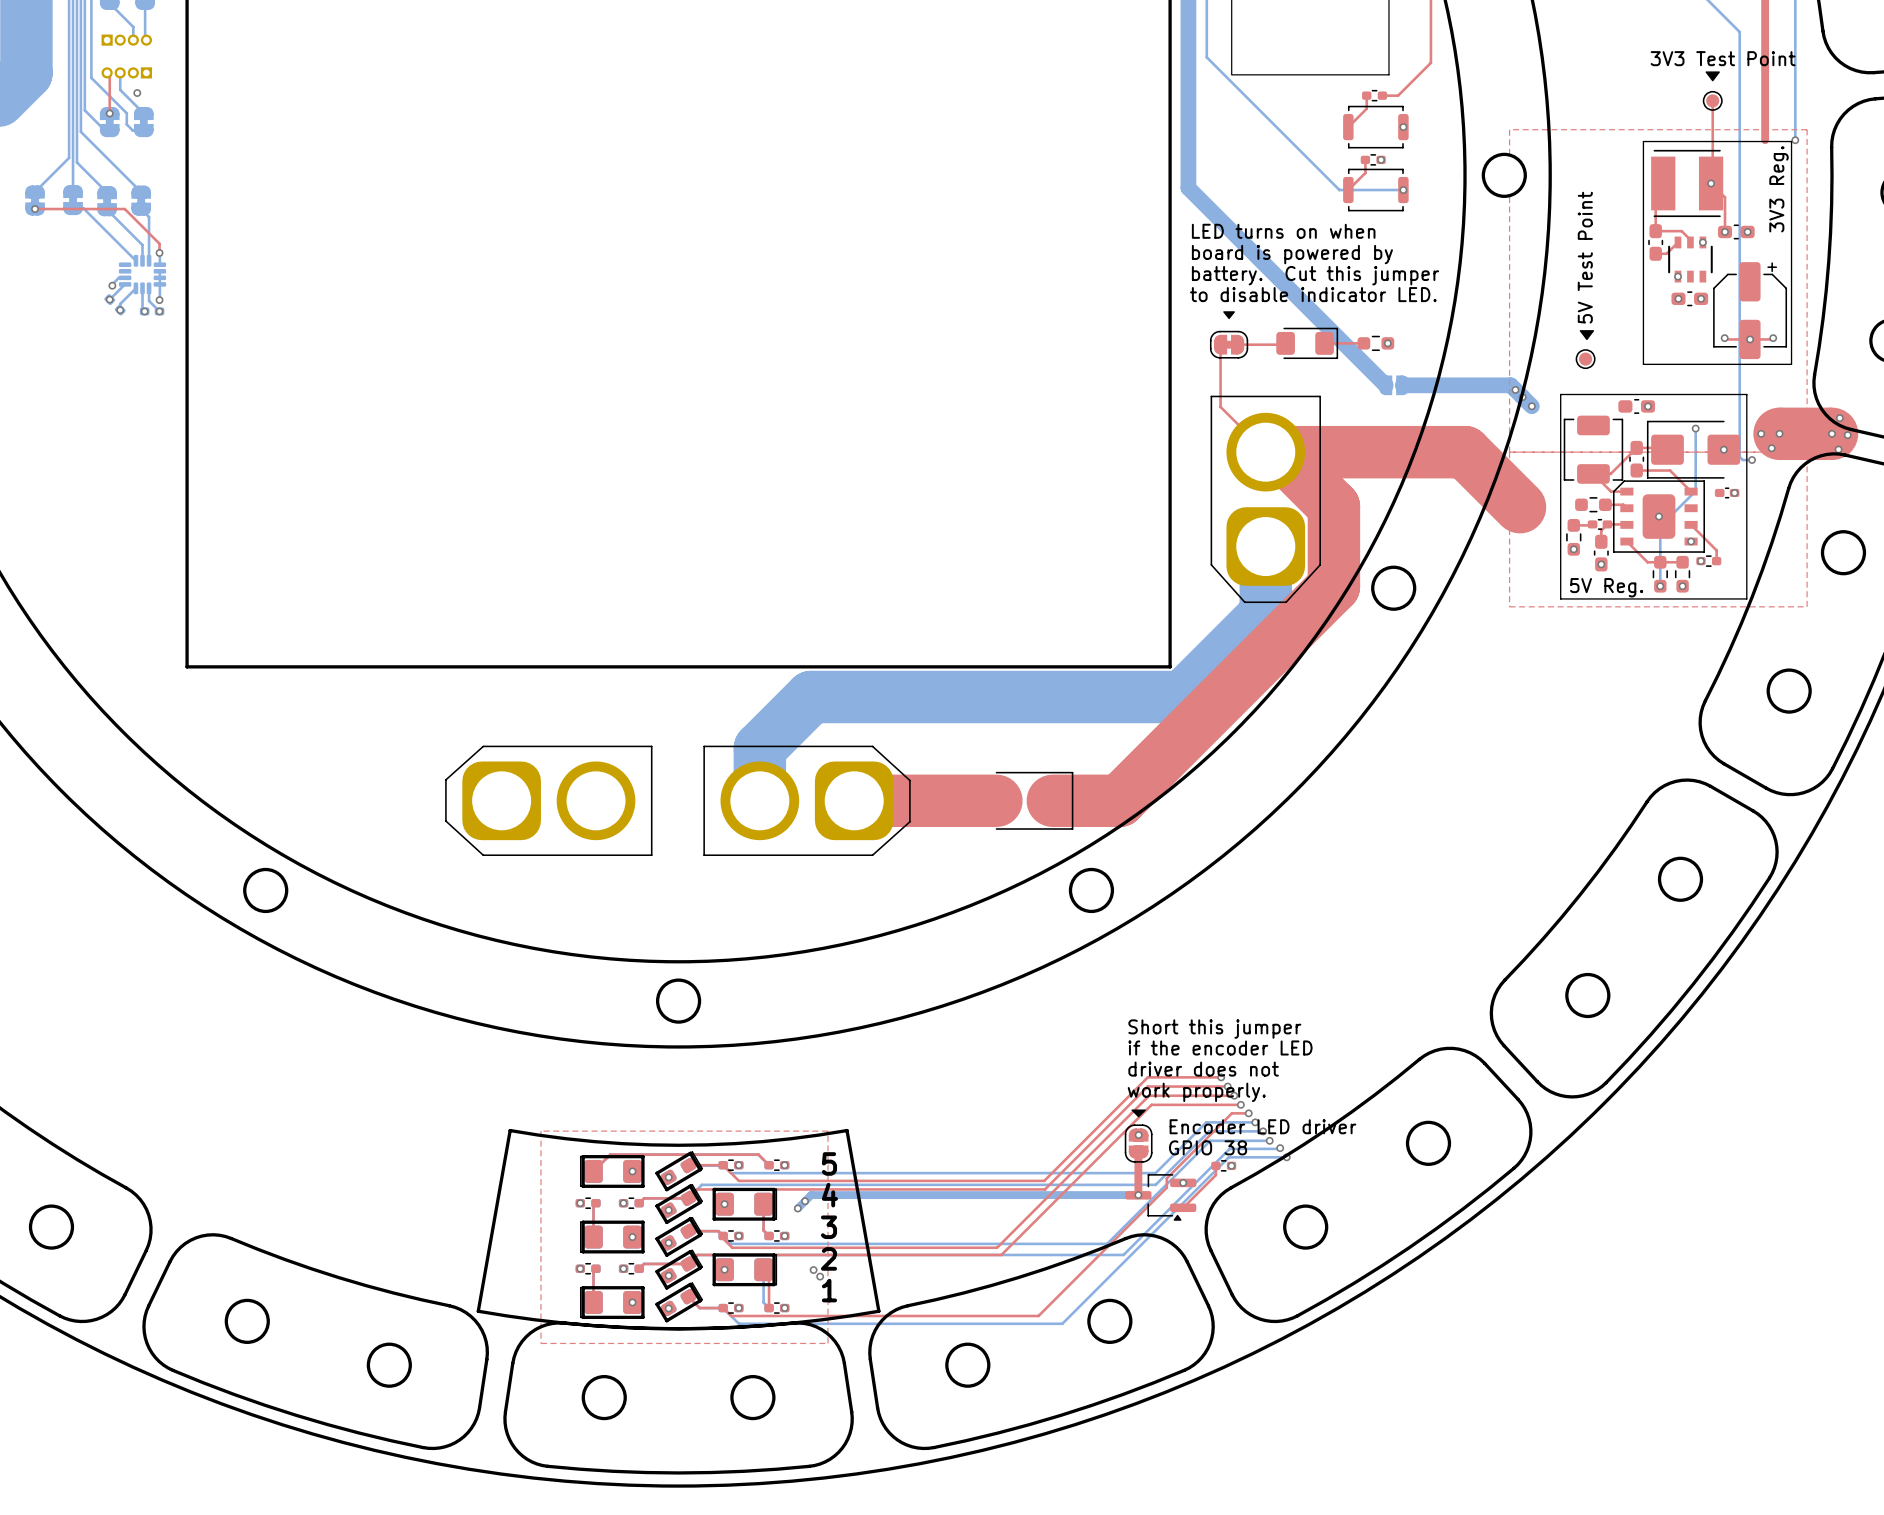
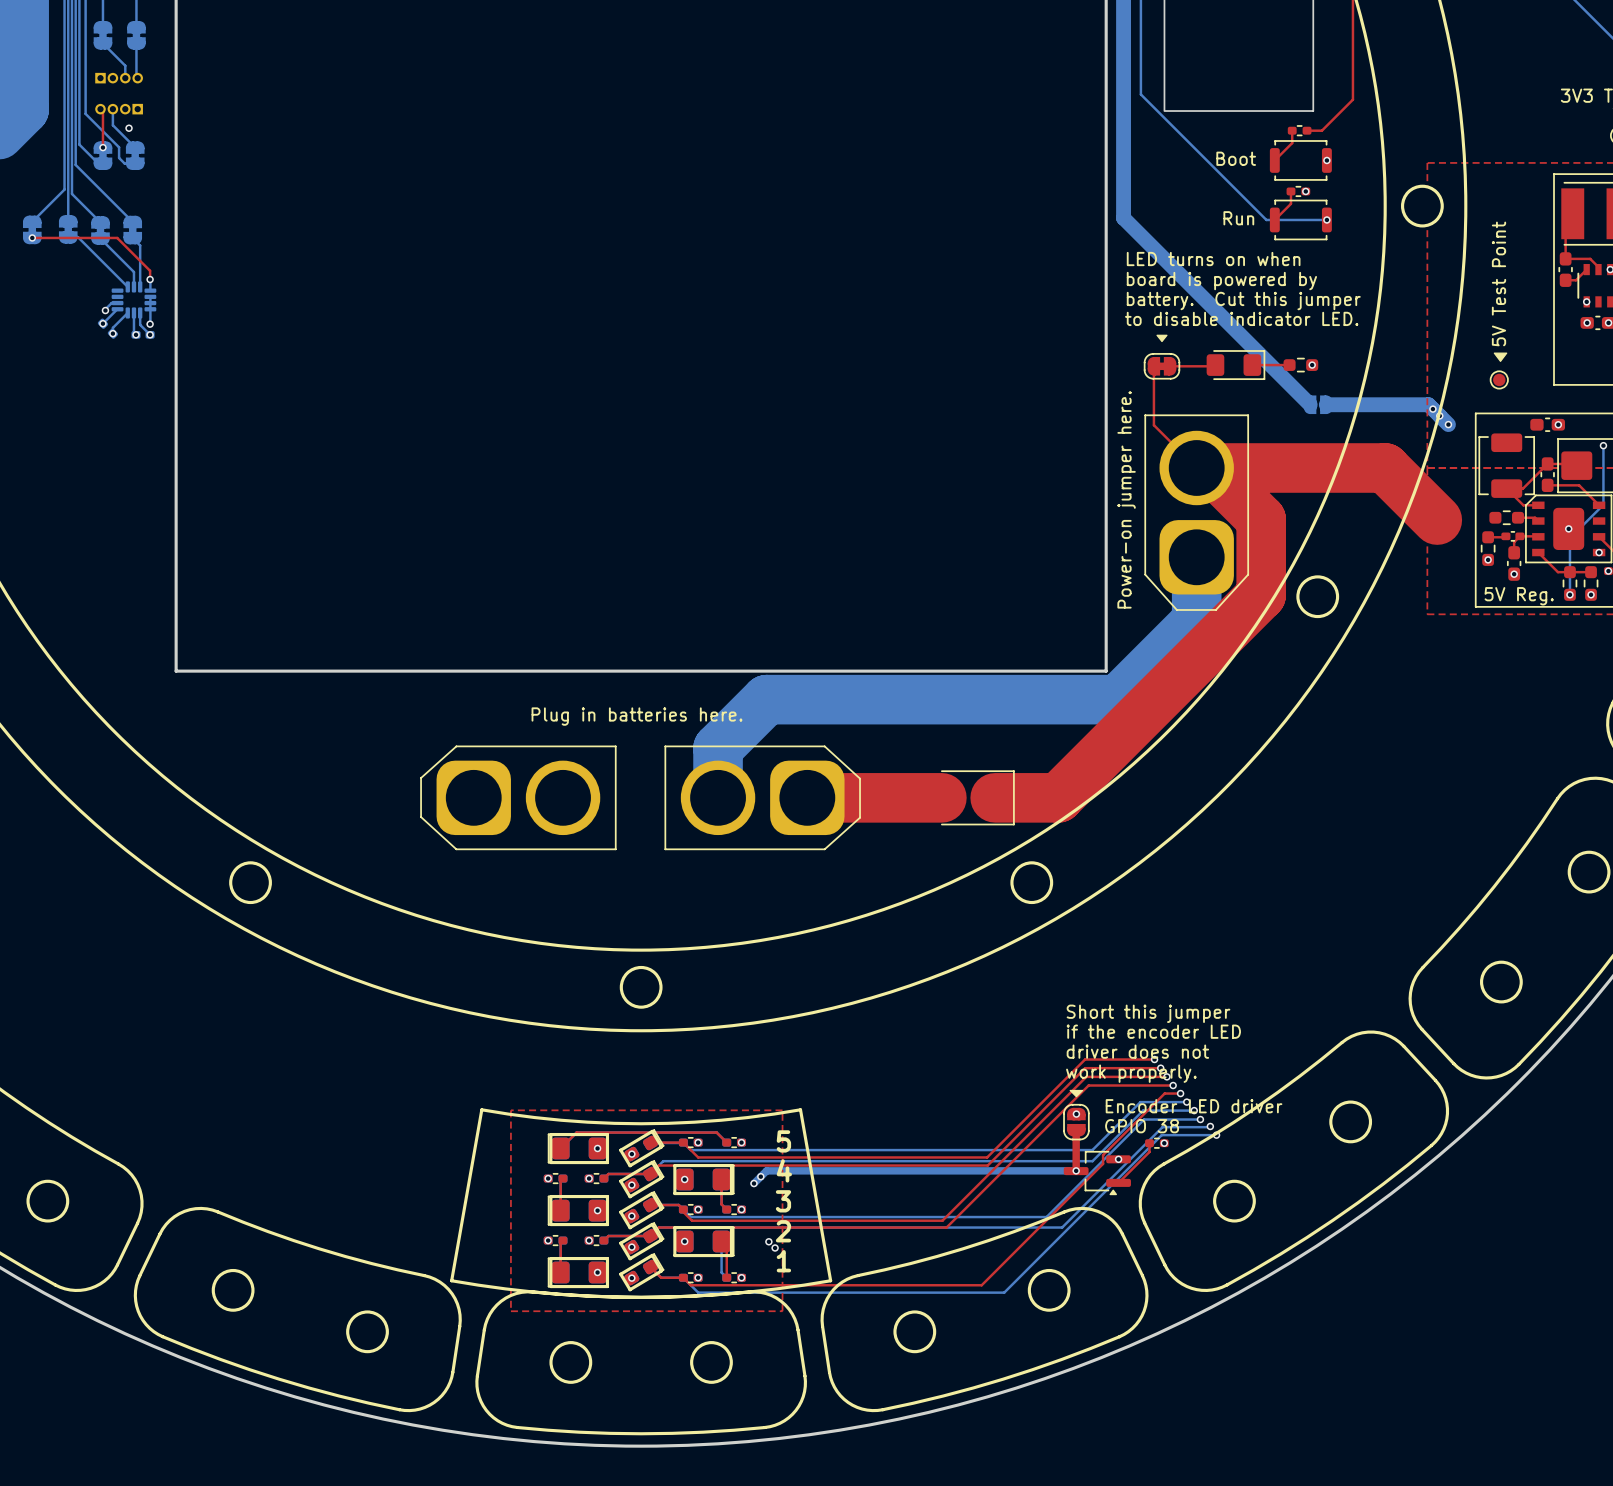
text: none -> Boot (1236, 158)
text: none -> Run (1238, 218)
text: none -> Power-on jumper here. (1126, 499)
text: none -> Plug in batteries here. (637, 716)

